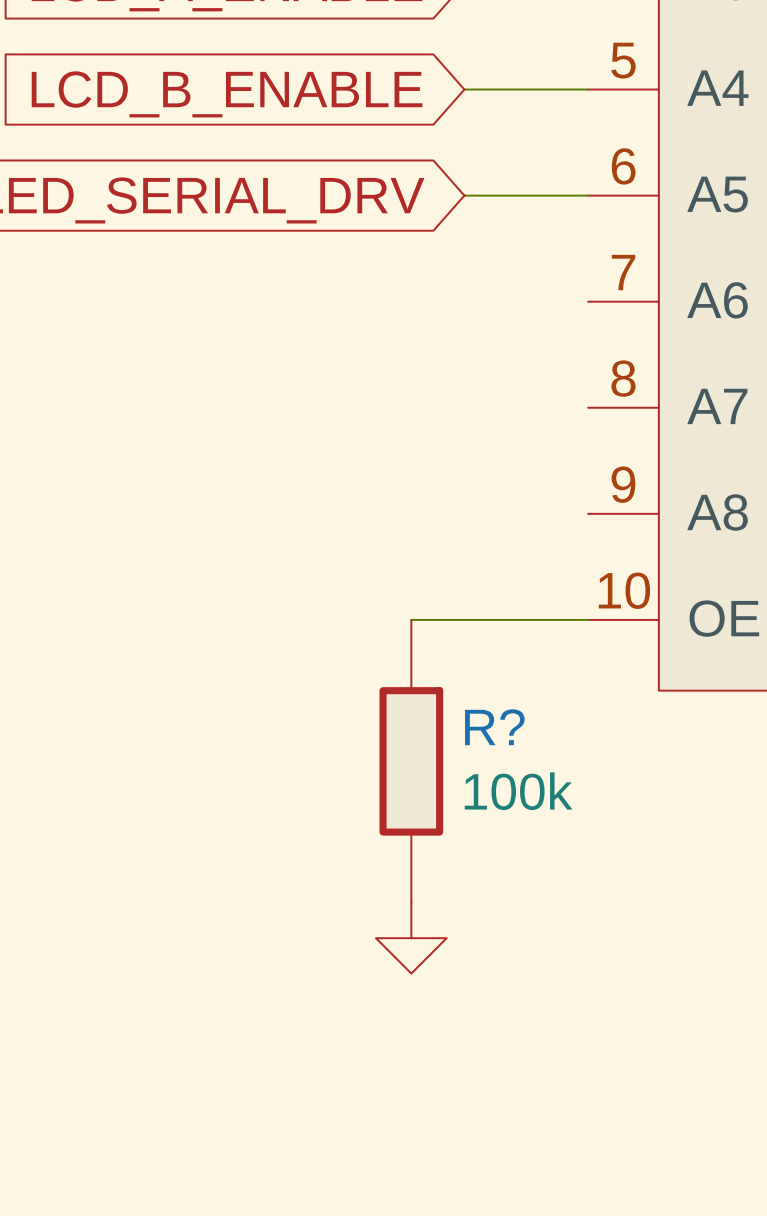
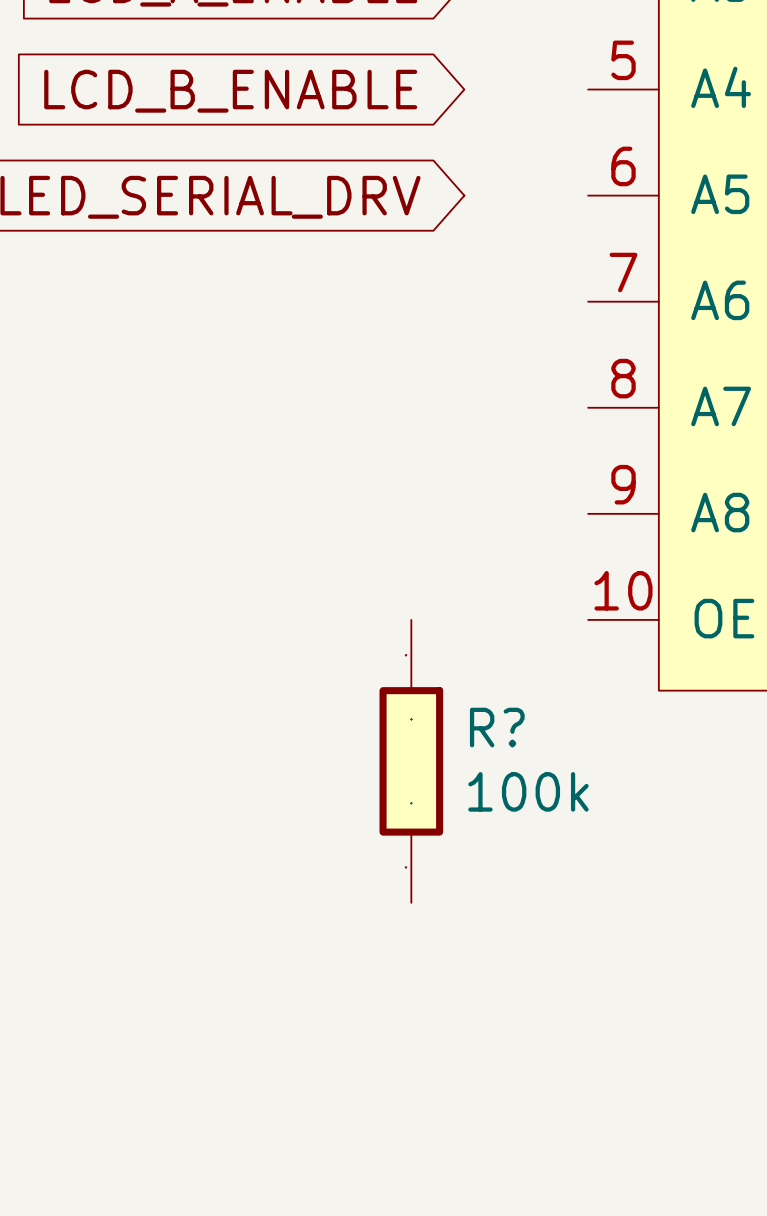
wire: (464, 89) (588, 89) -> none
wire: (464, 195) (588, 195) -> none
wire: (411, 619) (588, 619) -> none
power symbol: (411, 938) -> none

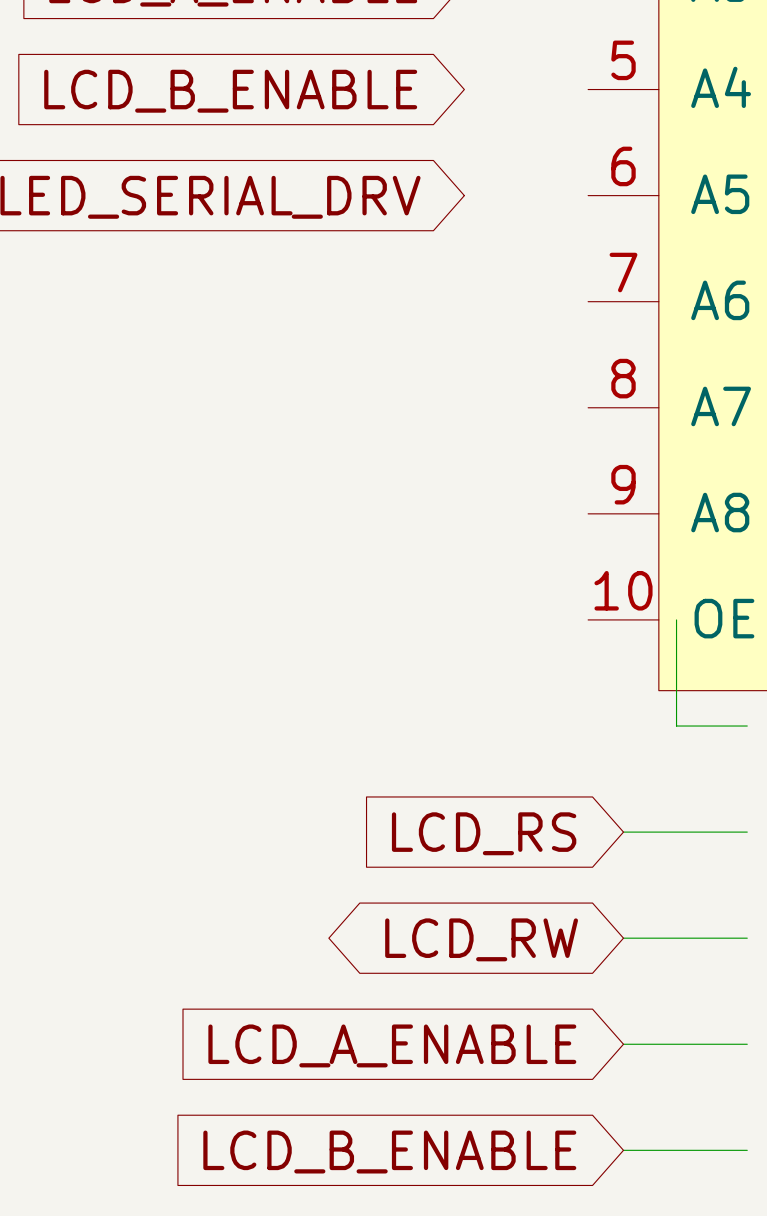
wire: none -> (676, 619) (676, 726) (747, 726)
R?: (411, 761) -> none
wire: none -> (623, 832) (747, 832)
global label: none -> LCD_RS (484, 833)
wire: none -> (623, 938) (747, 938)
global label: none -> LCD_RW (481, 939)
wire: none -> (623, 1044) (747, 1044)
global label: none -> LCD_A_ENABLE (392, 1045)
wire: none -> (623, 1150) (747, 1150)
global label: none -> LCD_B_ENABLE (389, 1152)

